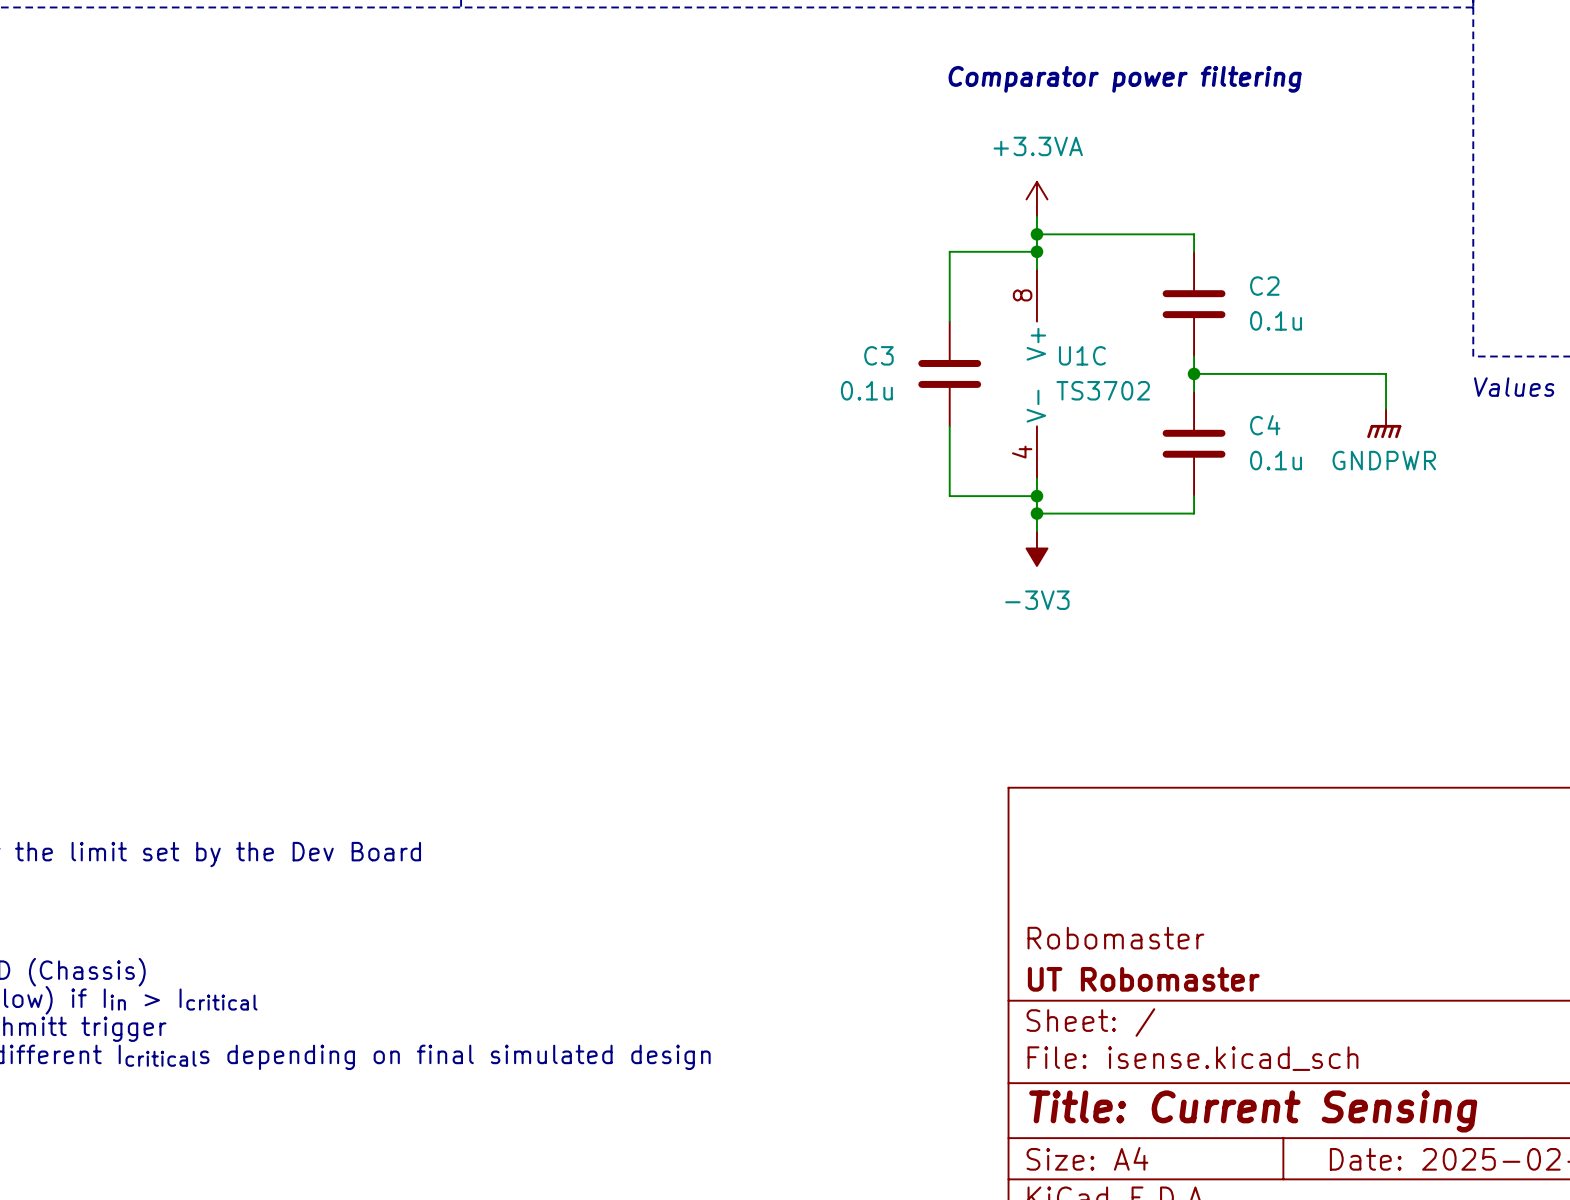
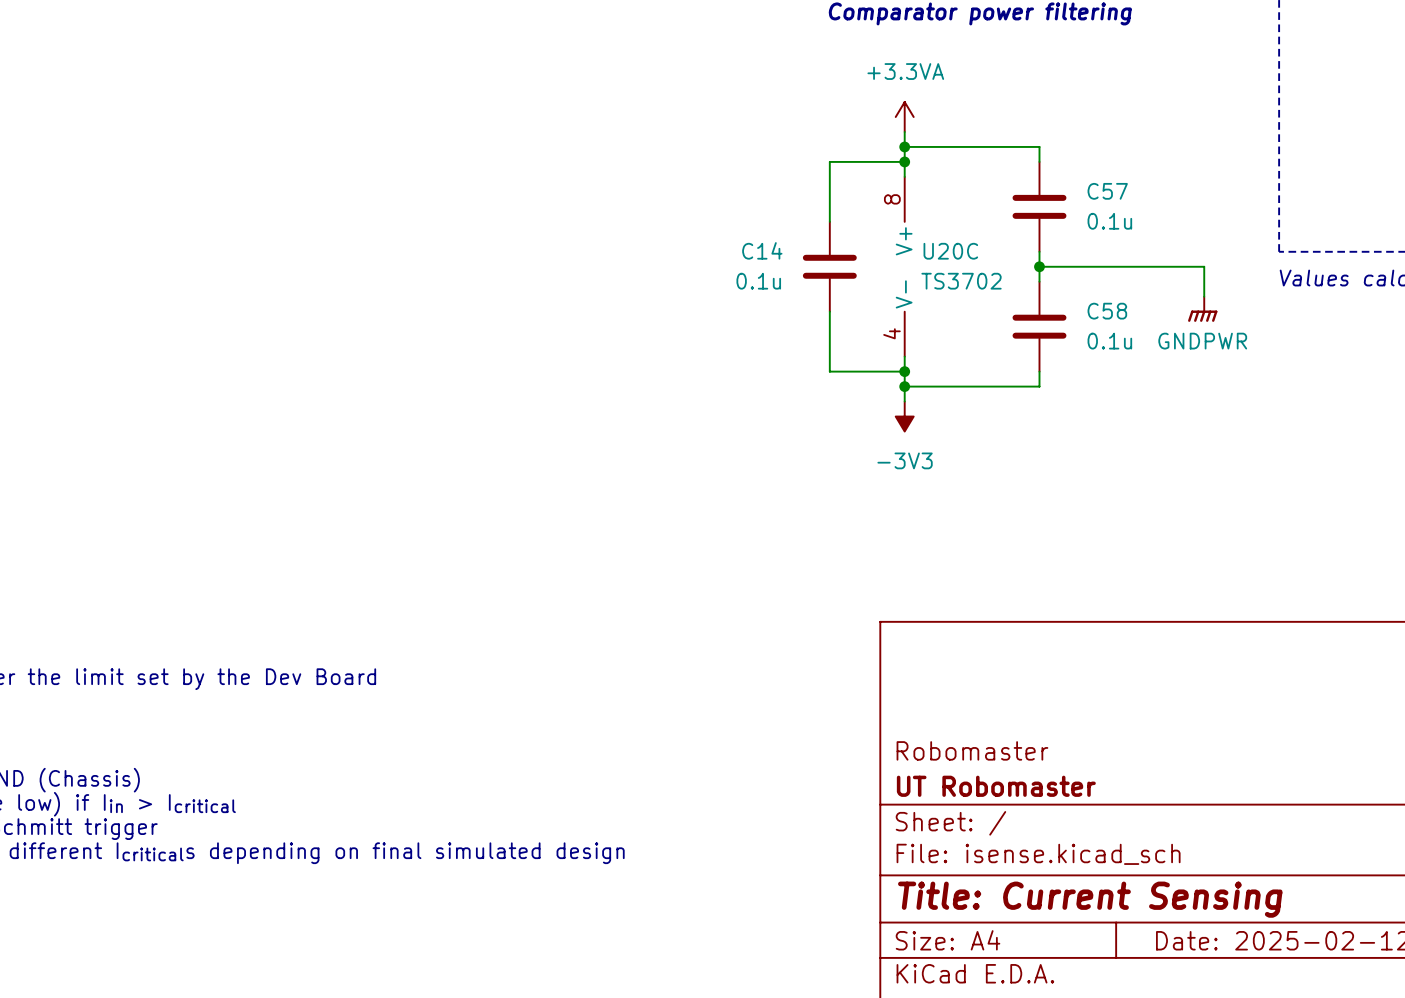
C2 name: C2 (1264, 286) -> C57 (1107, 191)
C3 name: C3 (878, 355) -> C14 (762, 250)
U1C name: U1C (1082, 355) -> U20C (950, 251)
C4 name: C4 (1265, 425) -> C58 (1107, 311)

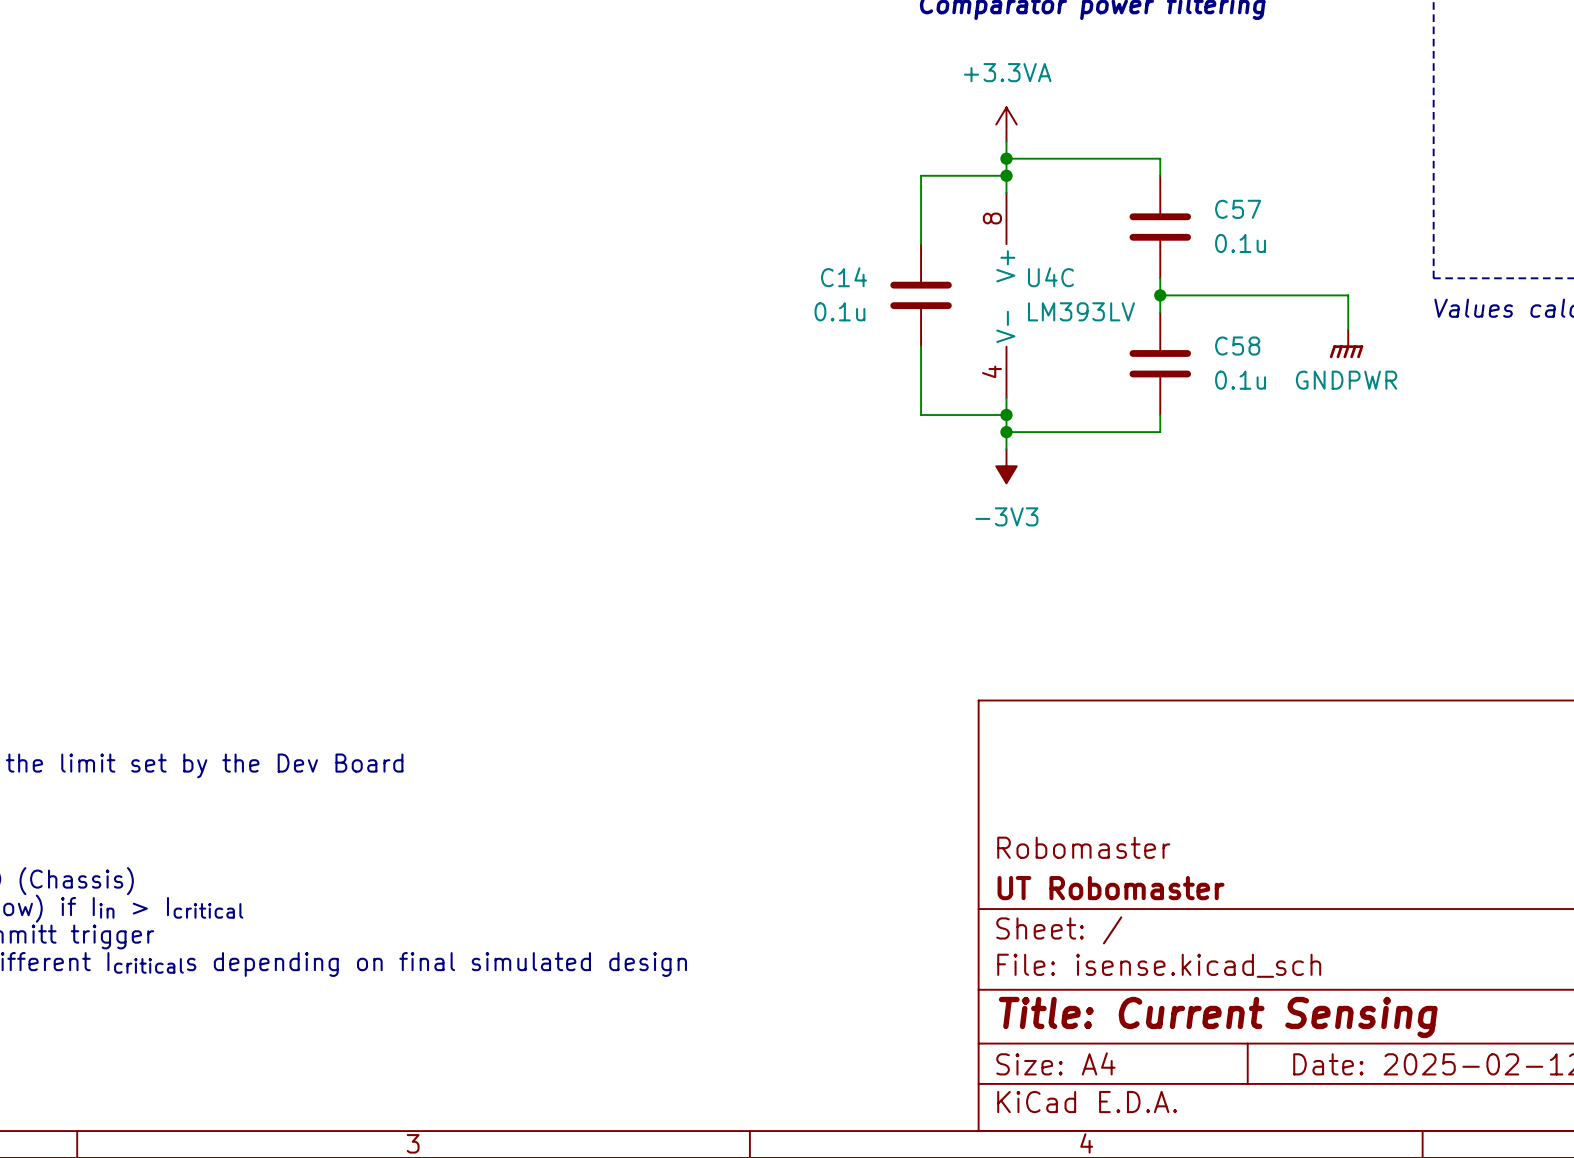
U20C name: U20C (950, 251) -> U4C (1050, 277)
U20C value: TS3702 (961, 281) -> LM393LV (1081, 311)

